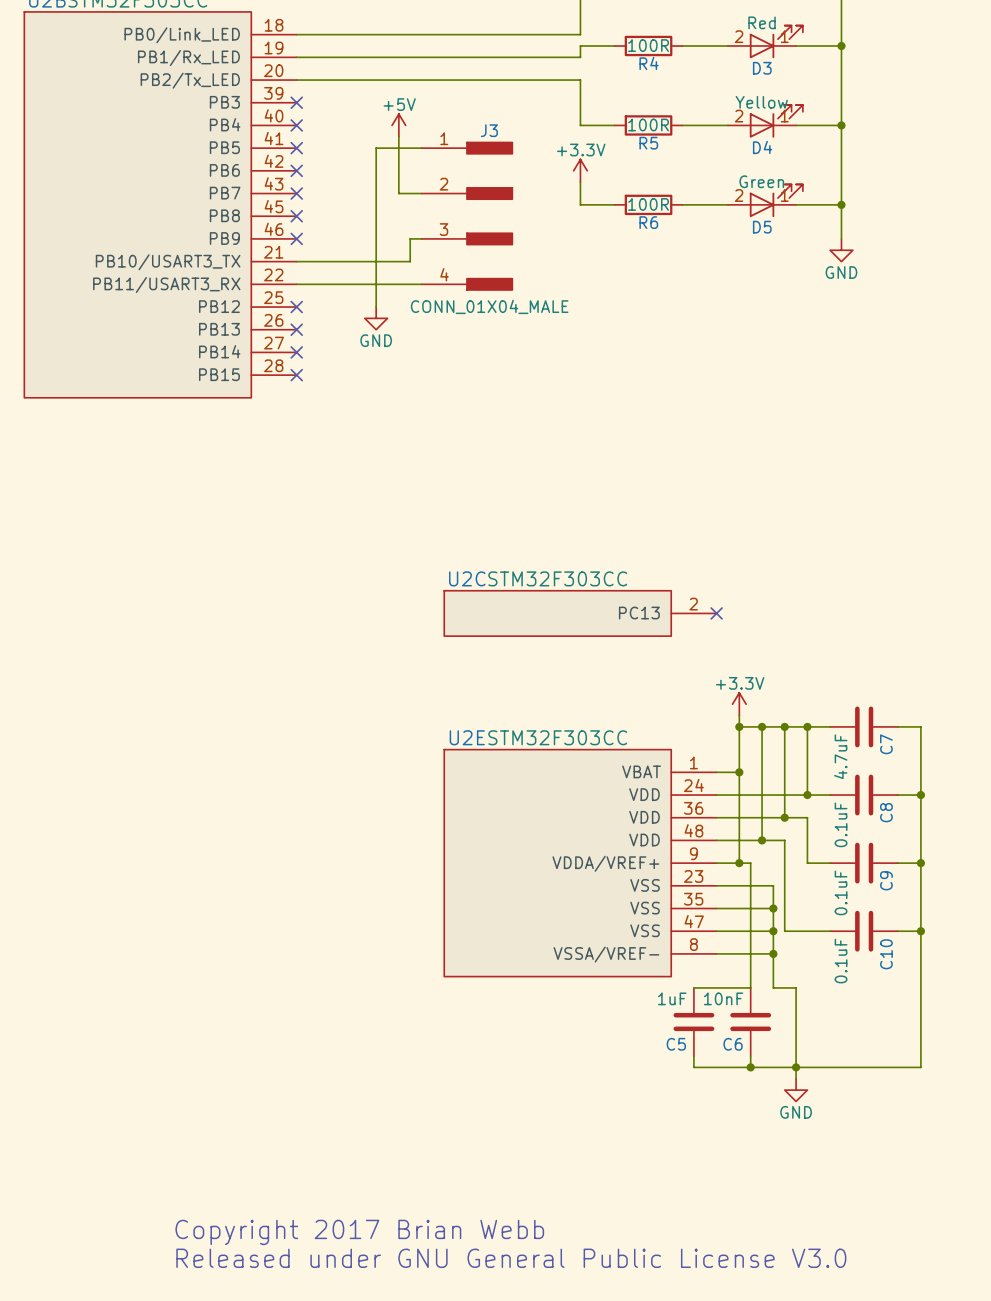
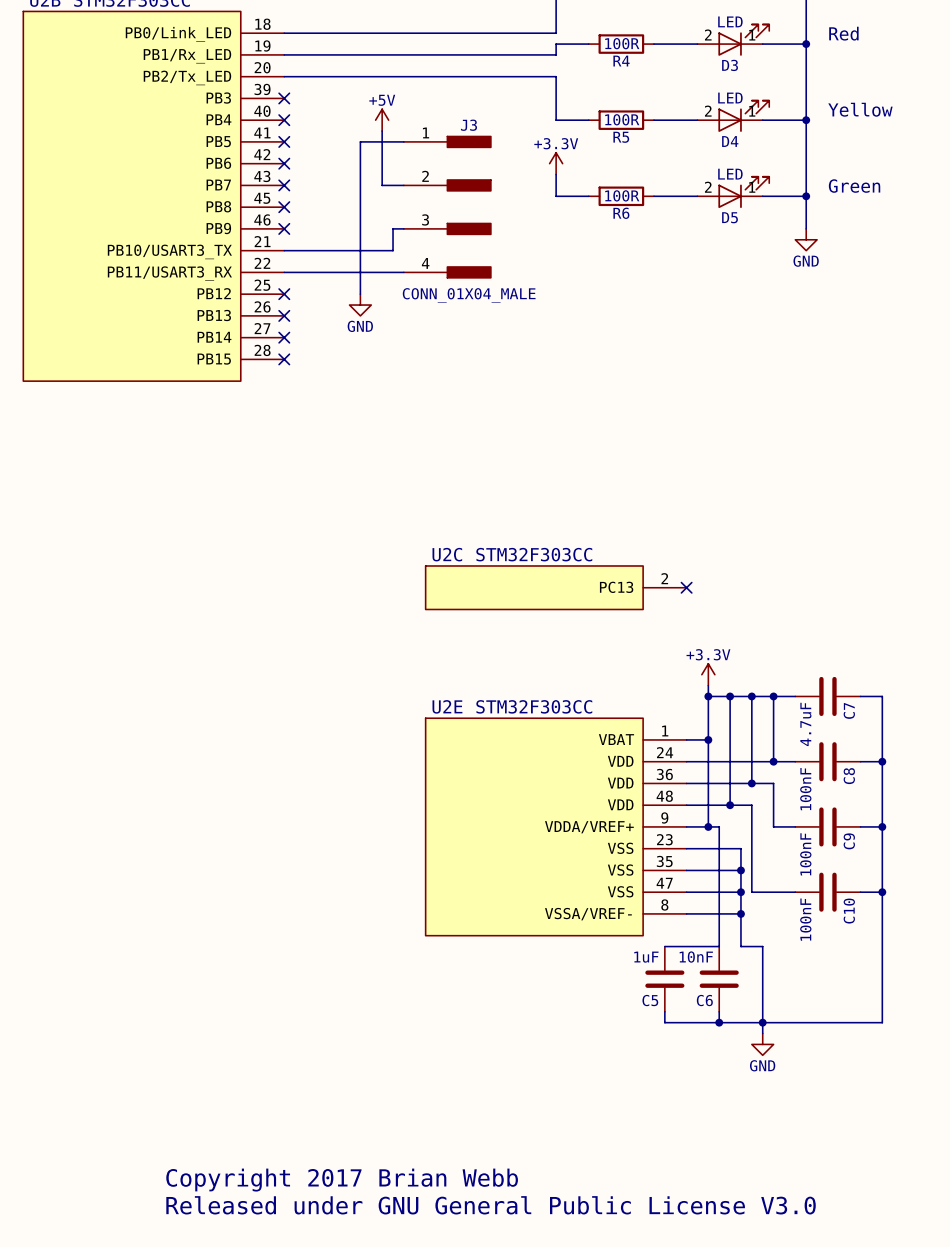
D3 value: Red (762, 22) -> LED (730, 21)
text: none -> Red (843, 33)
D4 value: Yellow (761, 102) -> LED (730, 98)
text: none -> Yellow (860, 109)
D5 value: Green (761, 181) -> LED (730, 174)
text: none -> Green (854, 186)
C8 value: 0.1uF (841, 824) -> 100nF (805, 789)
C9 value: 0.1uF (841, 892) -> 100nF (805, 854)
C10 value: 0.1uF (841, 961) -> 100nF (805, 919)

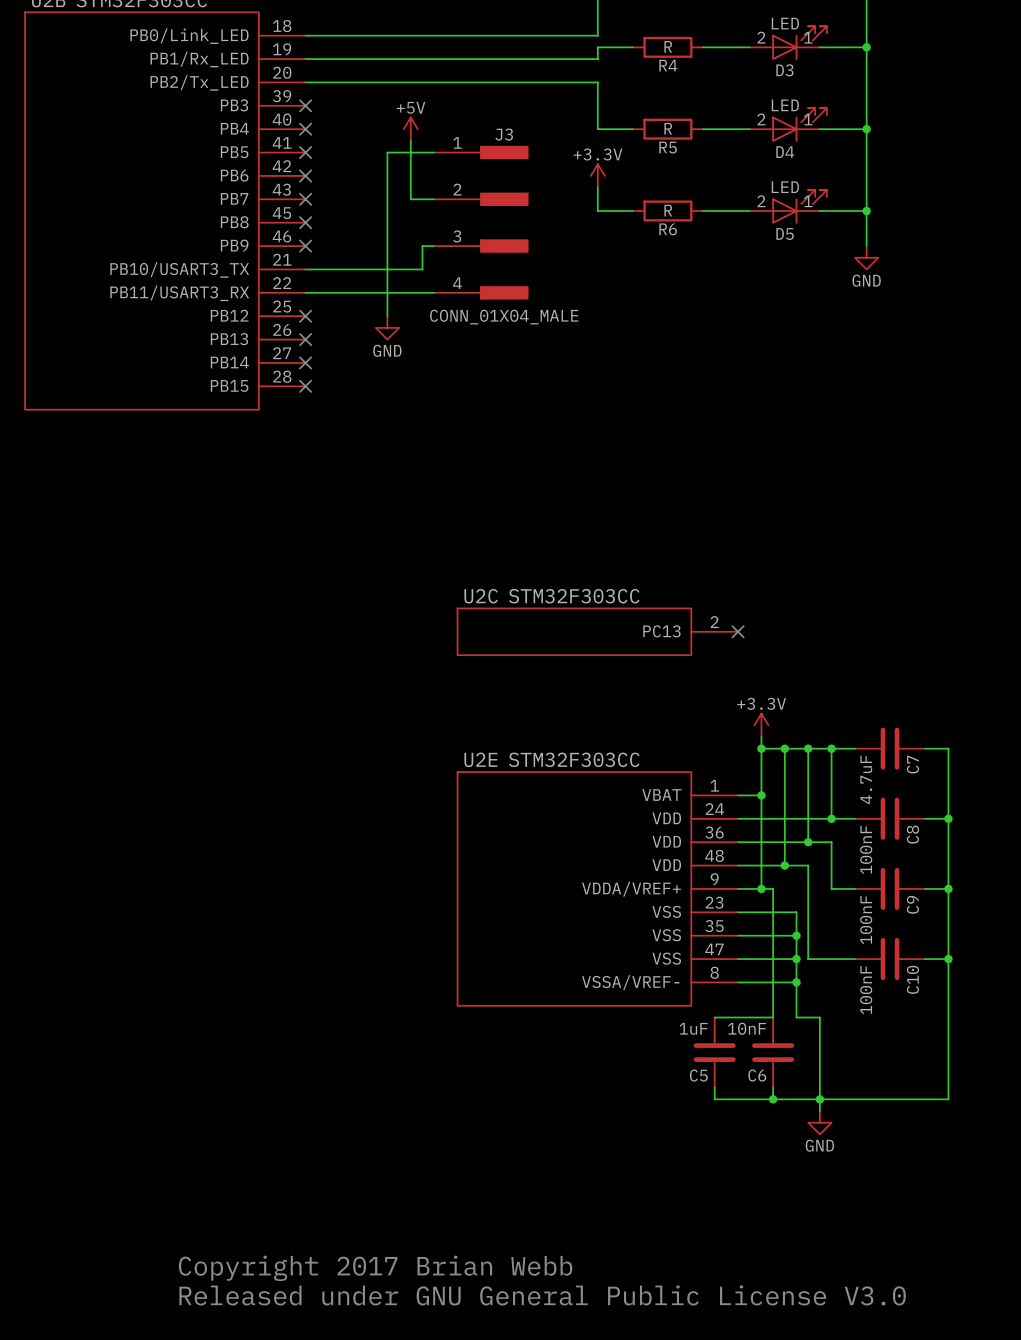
text: Red (843, 33) -> none
R4 value: 100R (622, 43) -> R (668, 46)
text: Yellow (860, 109) -> none
R5 value: 100R (622, 119) -> R (668, 128)
text: Green (854, 186) -> none
R6 value: 100R (622, 195) -> R (668, 210)

